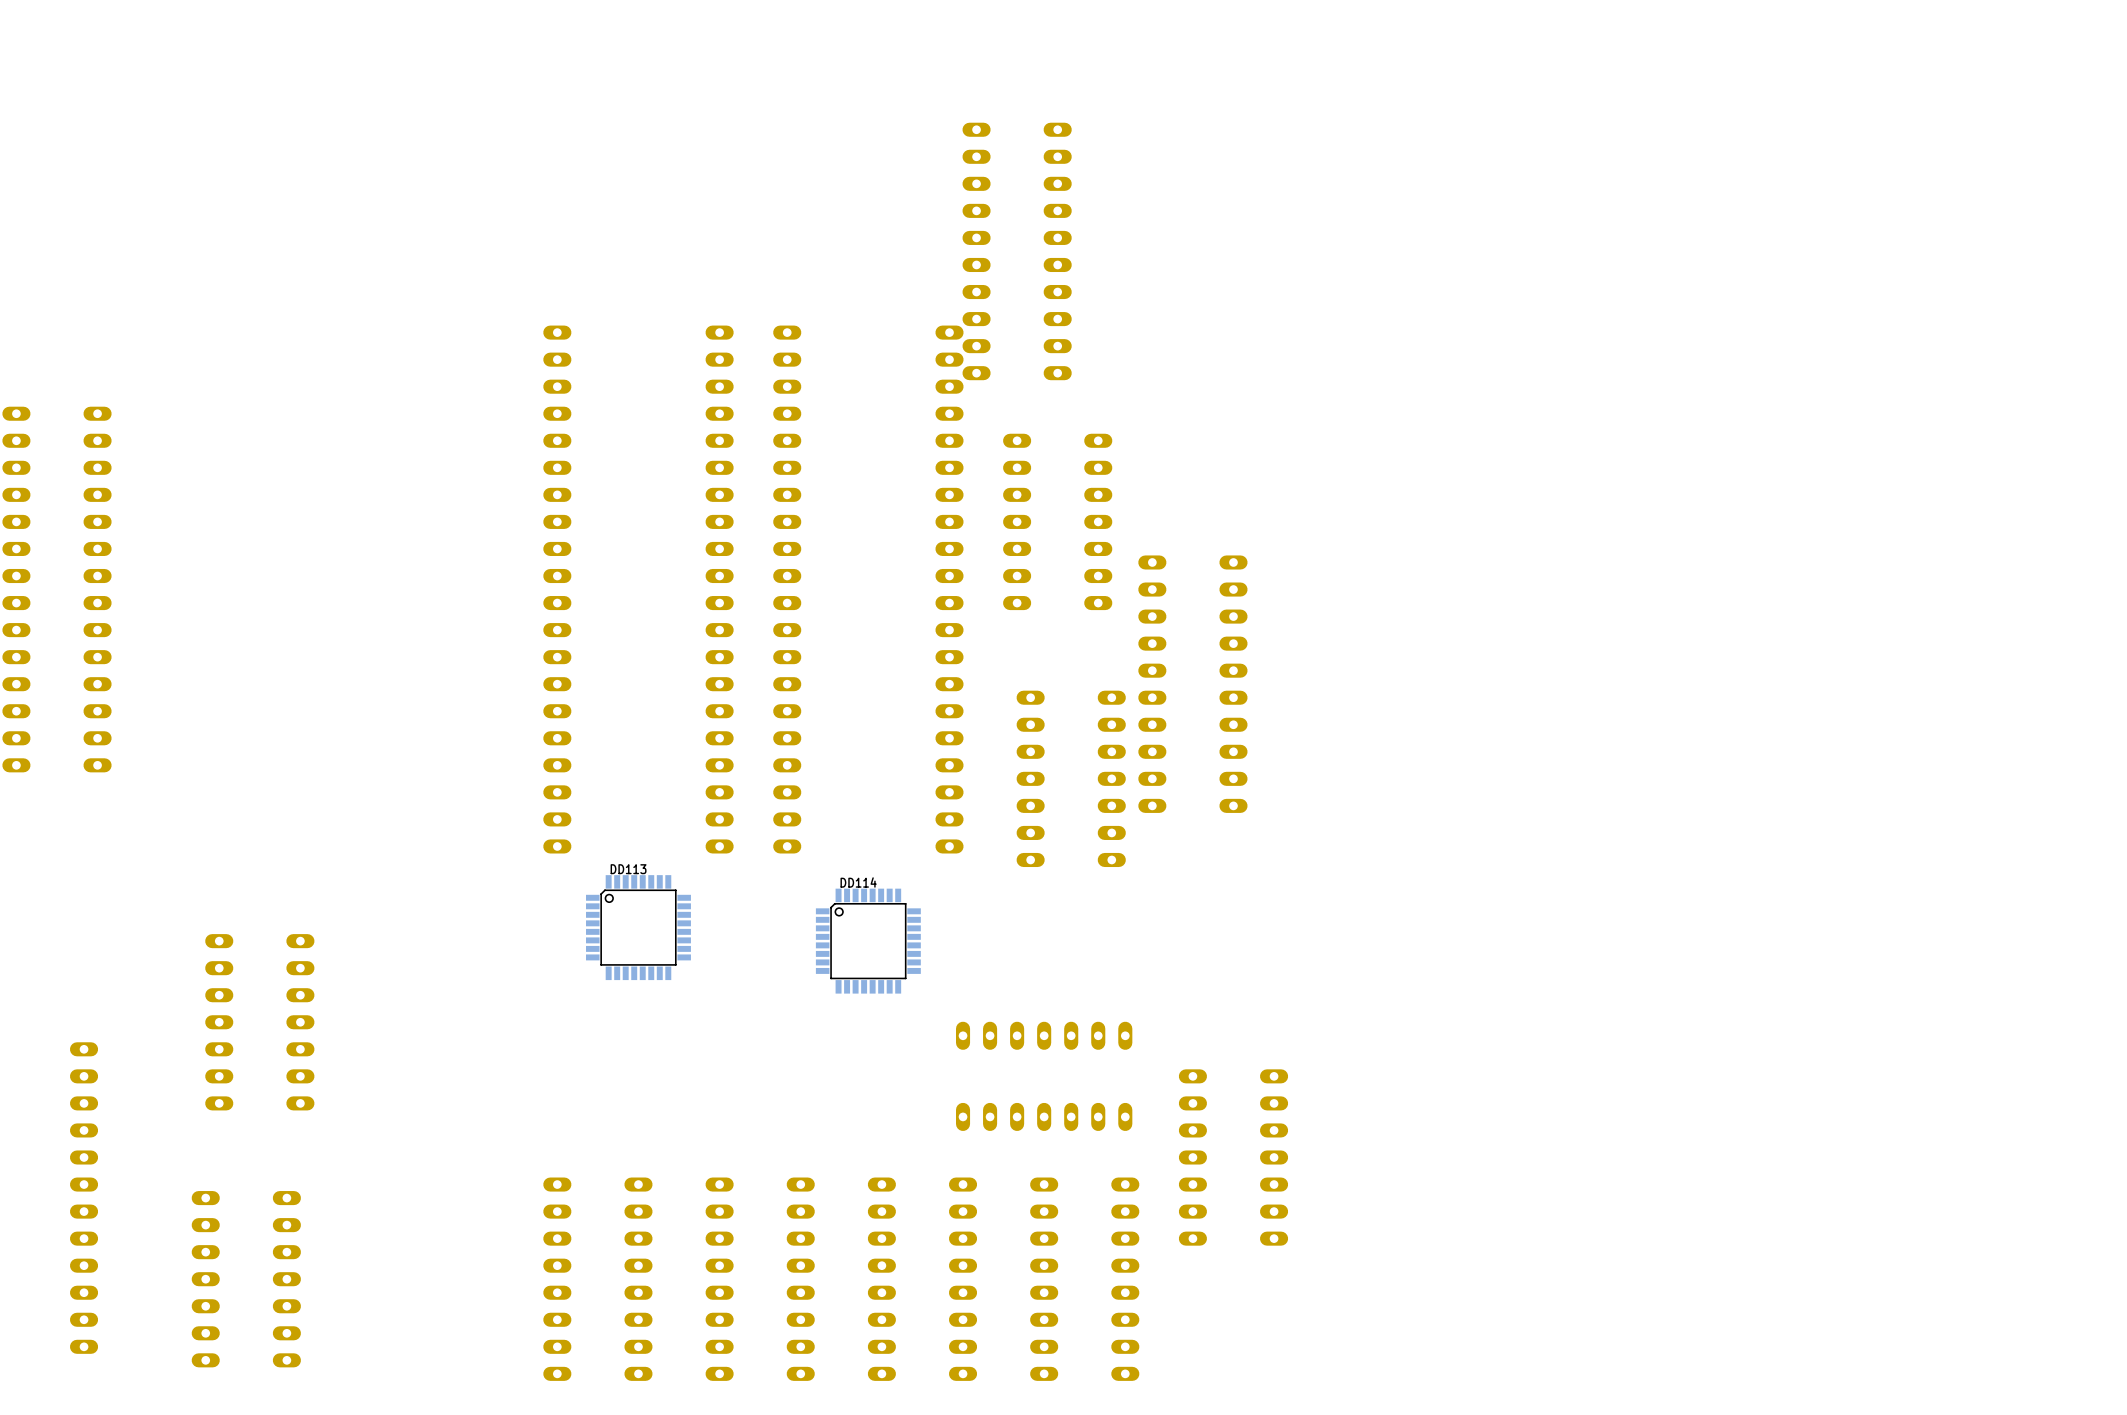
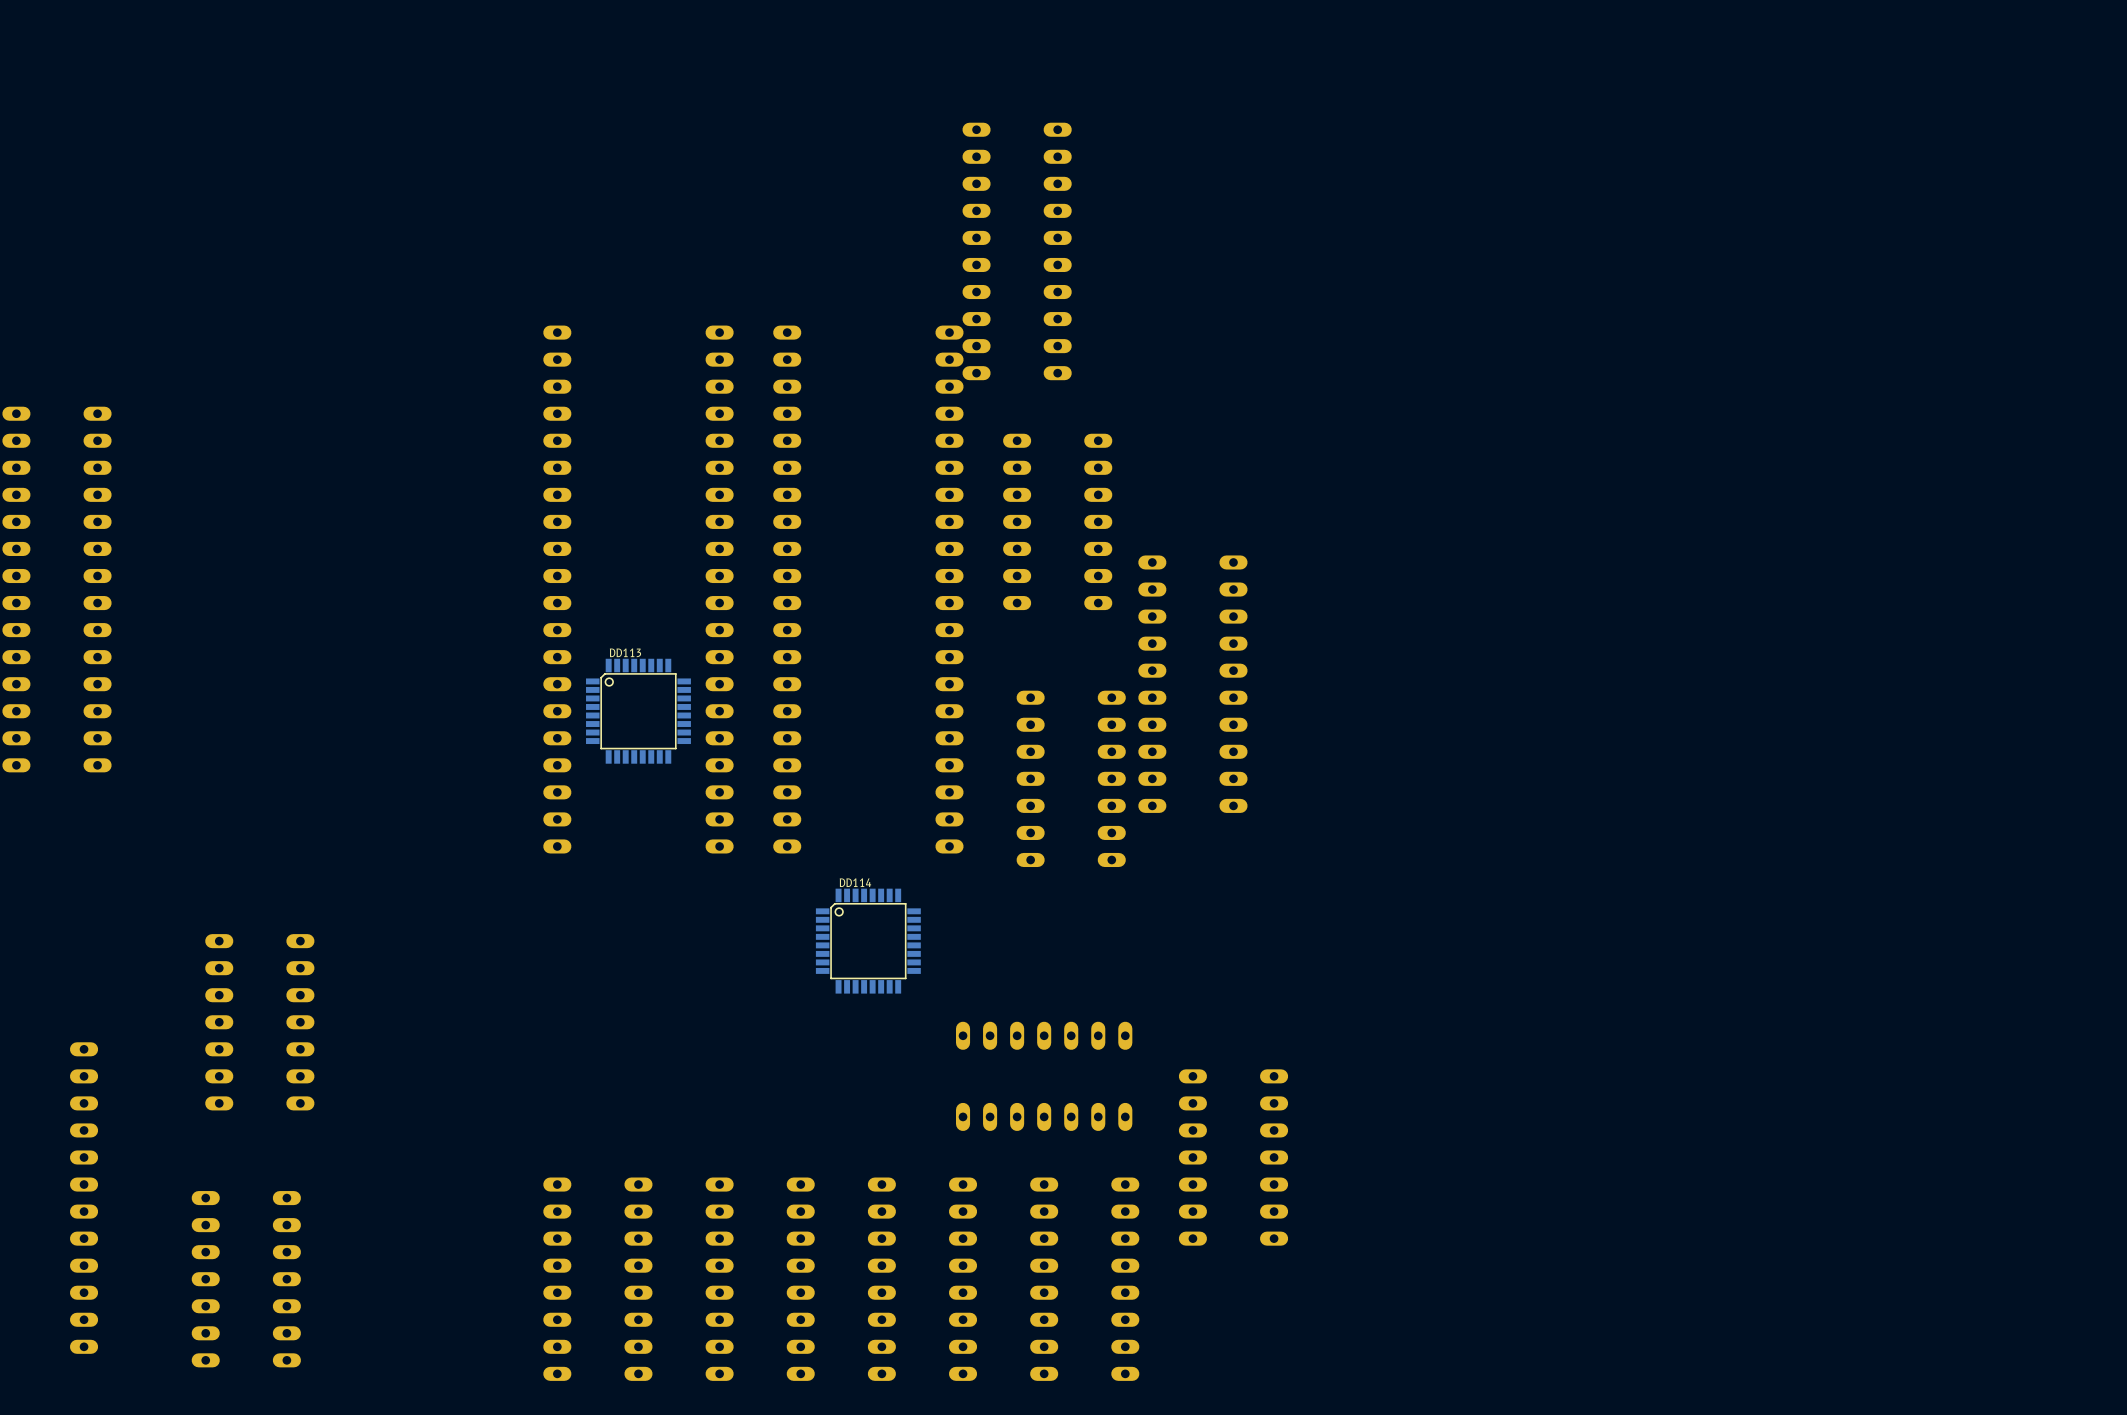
DD113 position: (638, 927) -> (638, 711)

